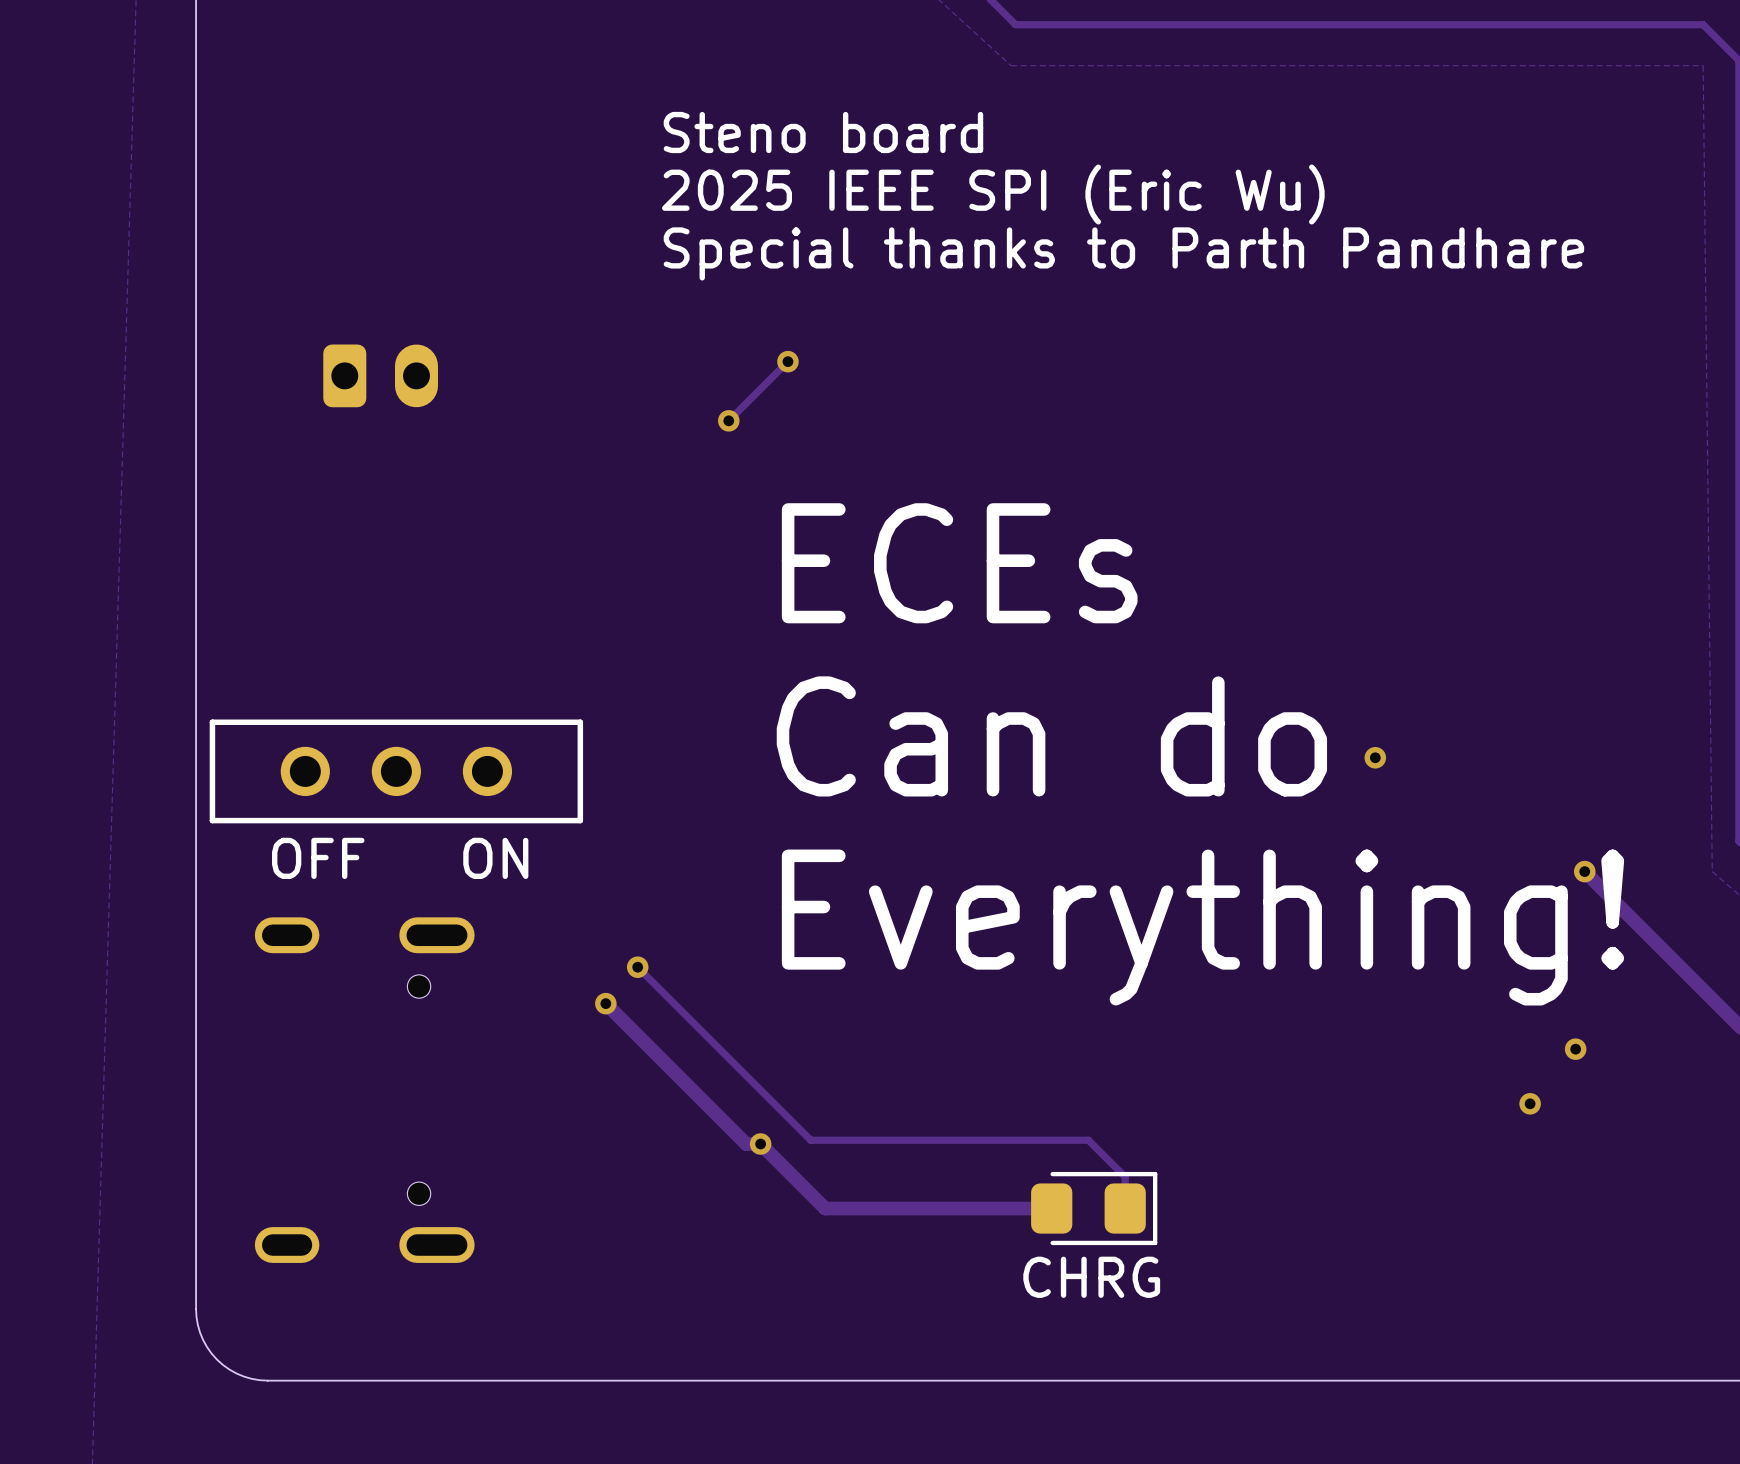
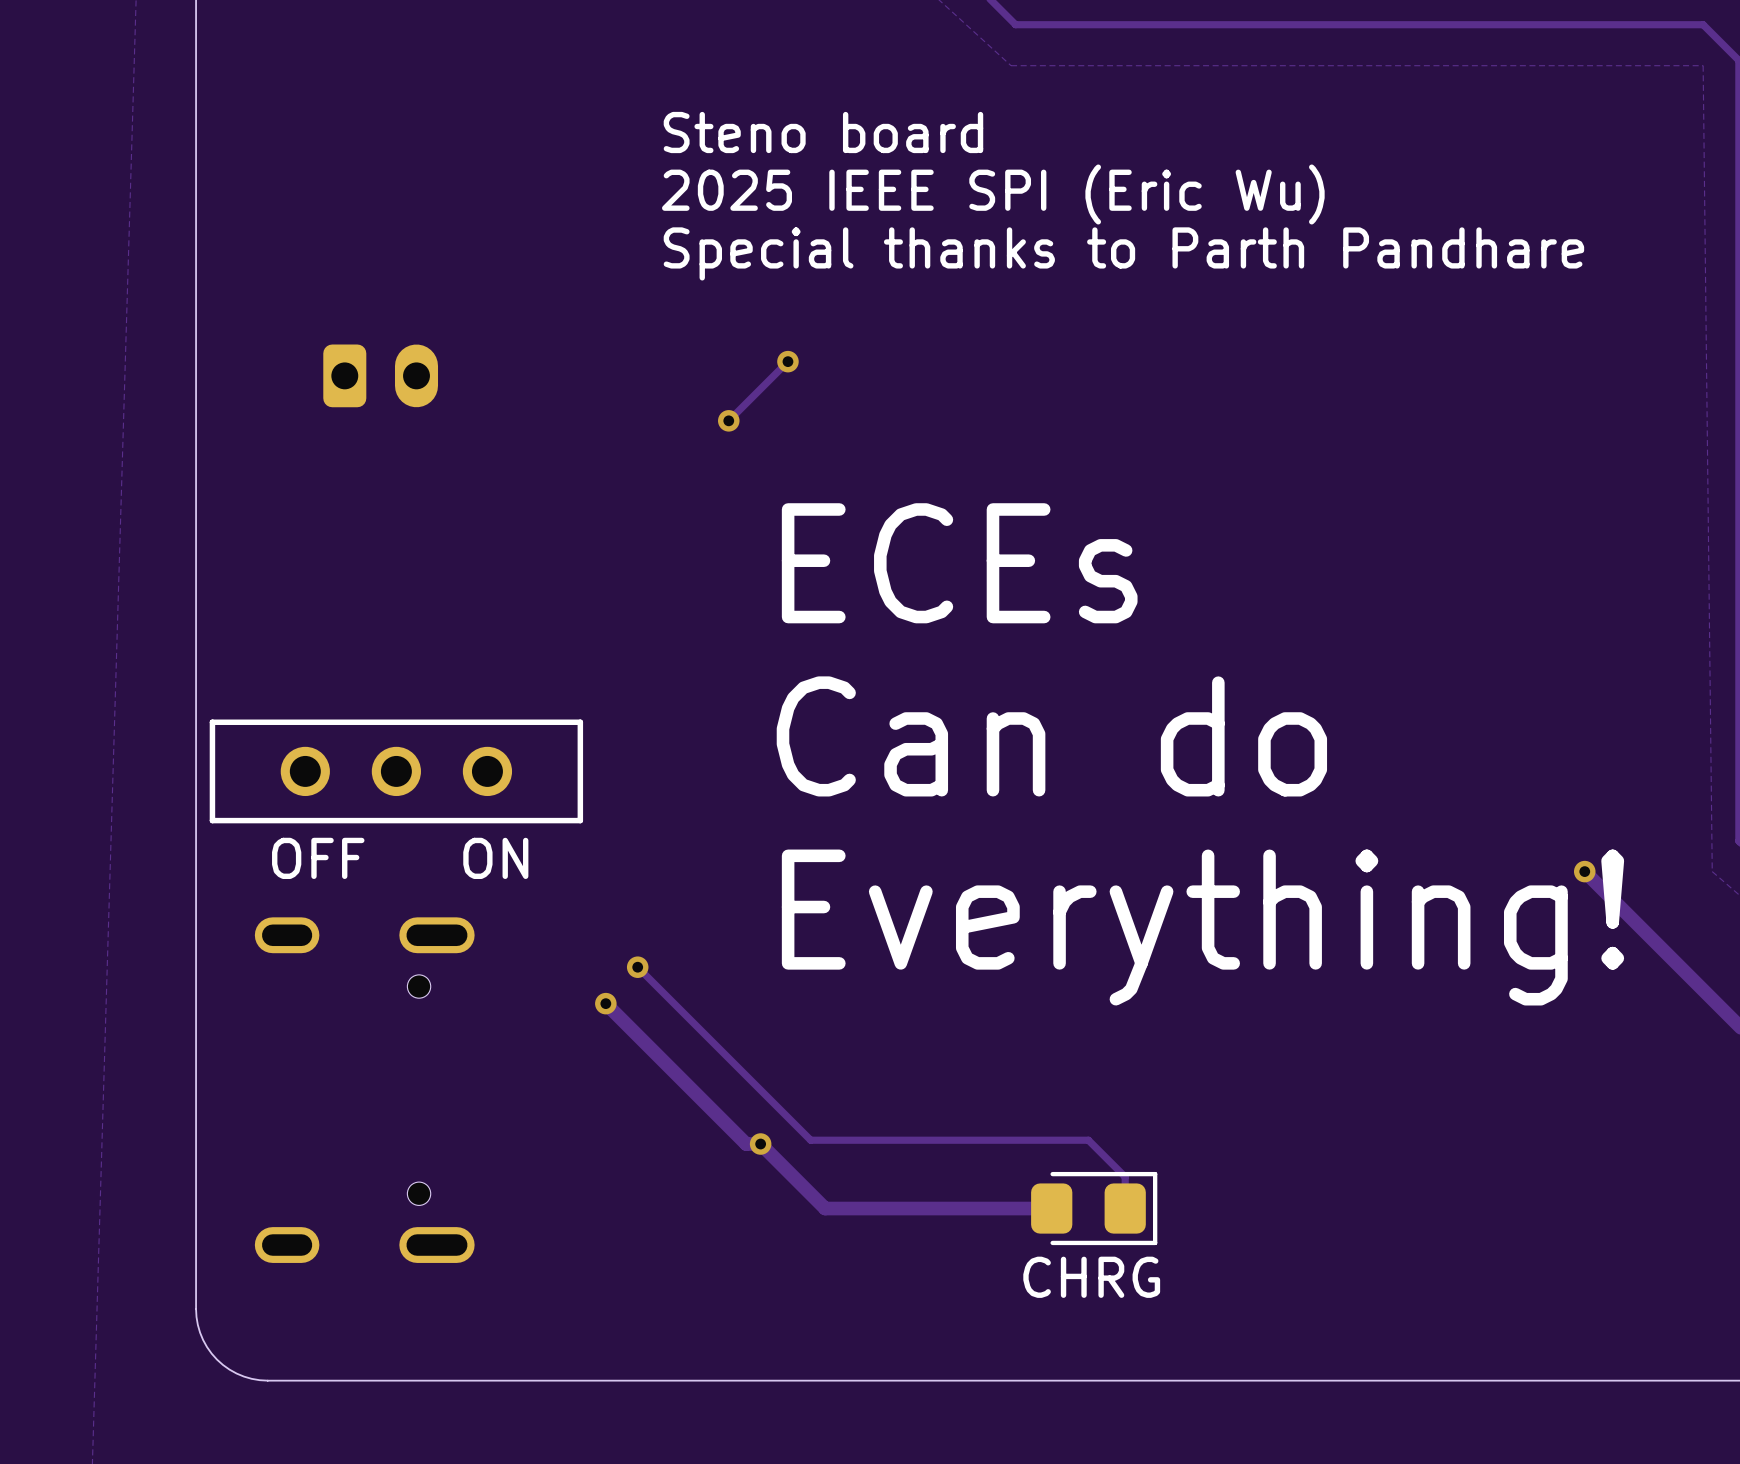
via: (1375, 757) -> none
via: (1575, 1049) -> none
via: (1530, 1103) -> none

